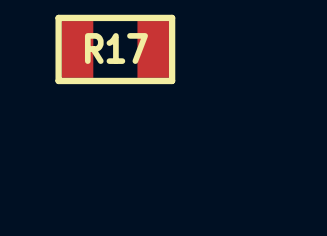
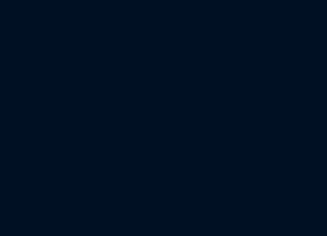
R17: (115, 49) -> none

